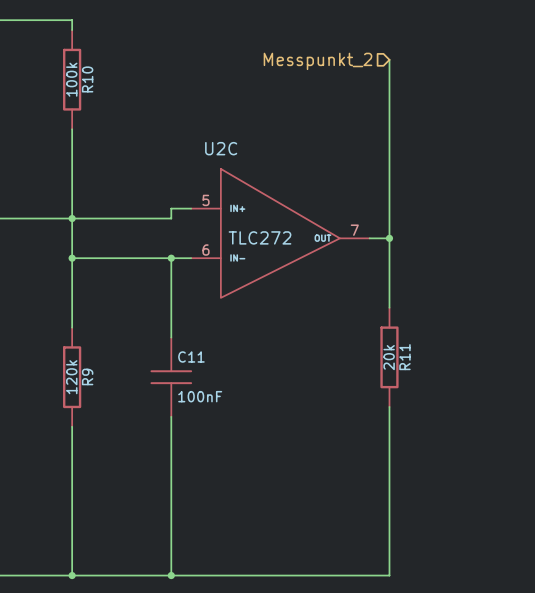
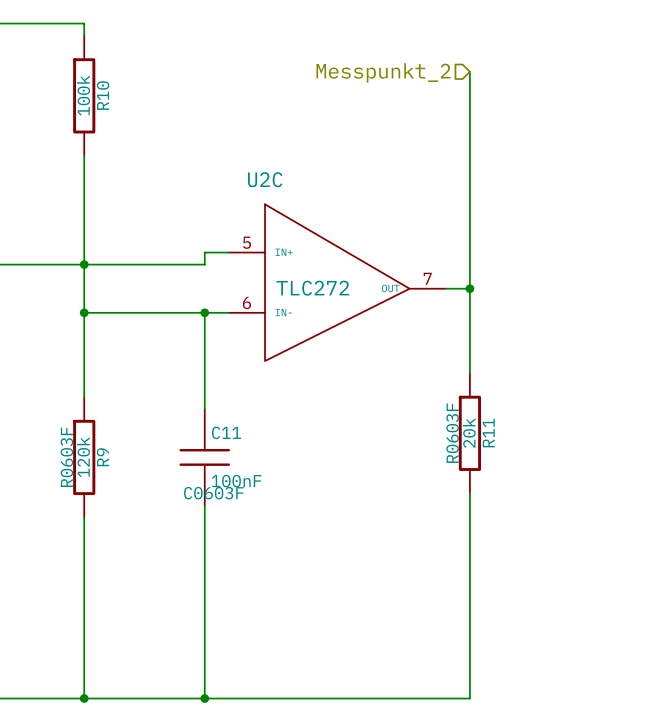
R11 text: none -> R0603F (452, 433)
R9 text: none -> R0603F (66, 457)
C11 text: none -> C0603F (213, 493)

